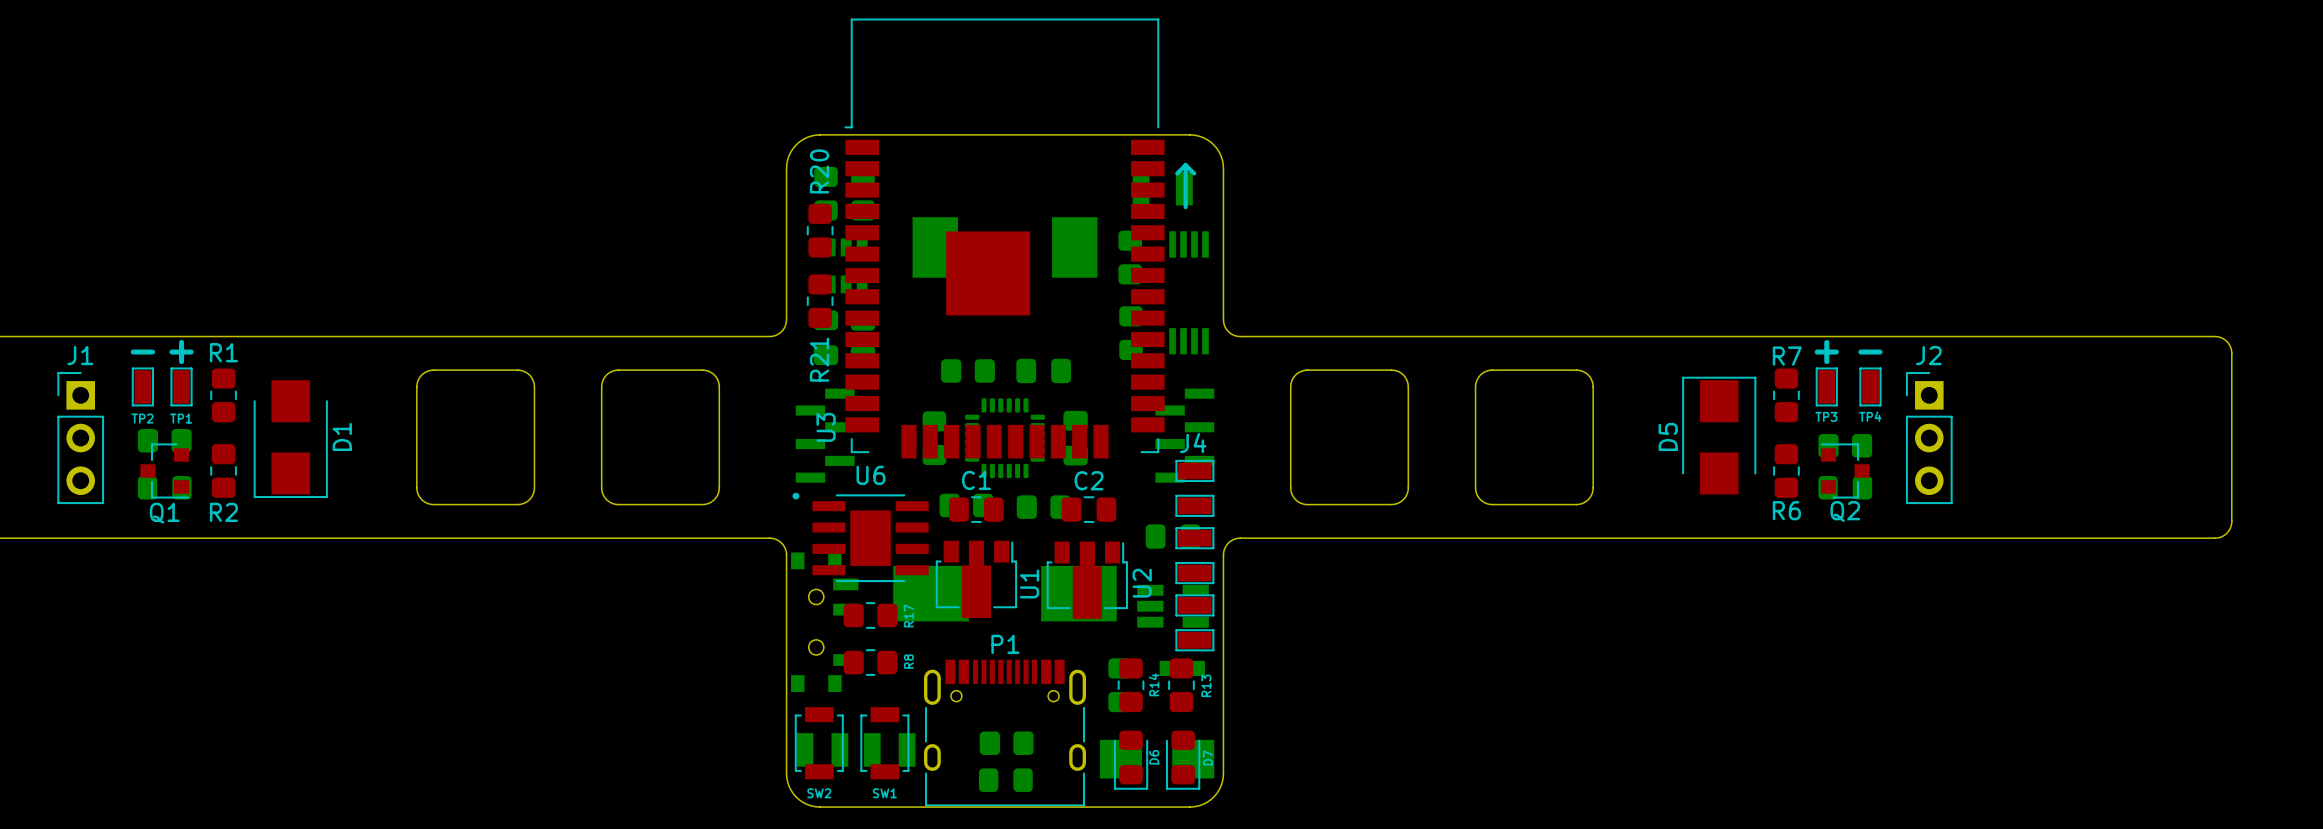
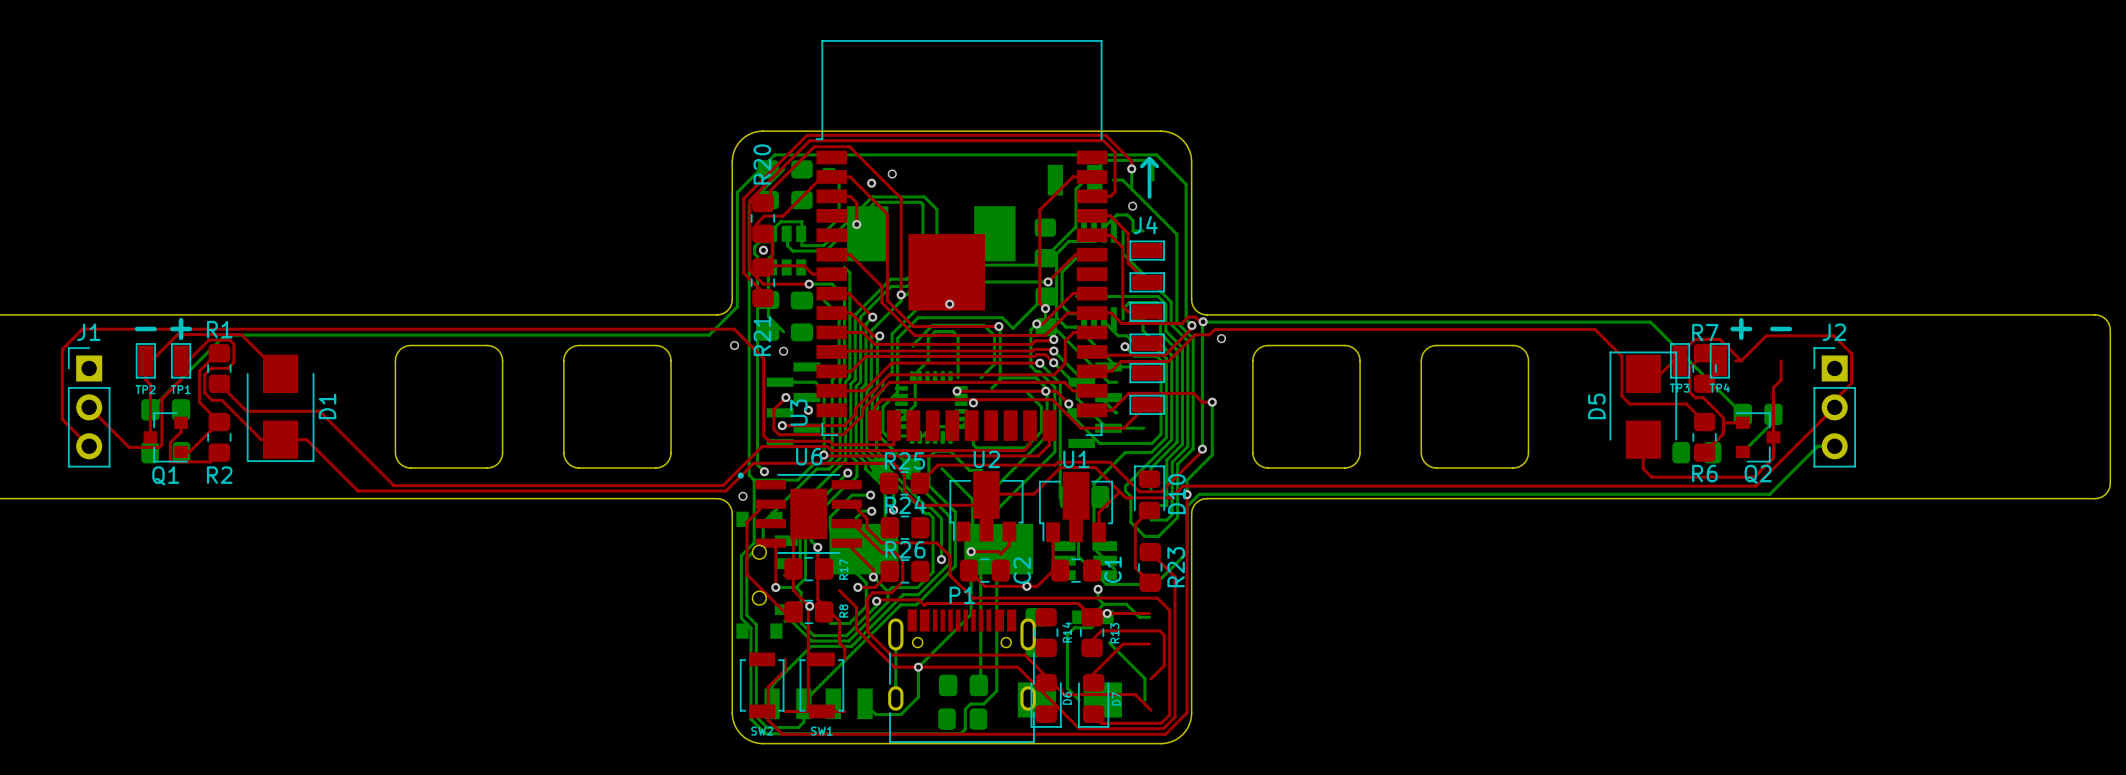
board edge: (1189, 134) (1198, 136) (1210, 141) (1218, 151) (1223, 164) (1223, 319) (1225, 328) (1230, 333) (1238, 336) (1307, 336) -> (1099, 131) (1165, 131) (1179, 137) (1187, 146) (1191, 161) (1191, 301) (1196, 310) (1206, 314)
line: (1185, 165) (1194, 173) -> (1149, 158) (1157, 166)
line: (1185, 165) (1177, 173) -> (1149, 158) (1141, 166)
line: (1185, 165) (1185, 207) -> (1149, 158) (1149, 197)
bottom track: none -> (783, 169) (749, 203) (749, 475) (754, 480)
bottom track: none -> (824, 169) (833, 169) (839, 175) (839, 218) (827, 229) (827, 241) (823, 245) (801, 245) (801, 221) (780, 221) (772, 229) (772, 254) (768, 258) (768, 316) (783, 331)
bottom track: none -> (1131, 168) (1131, 189)
top track: none -> (1131, 168) (1131, 161) (1105, 135) (807, 135) (743, 198) (743, 273) (770, 298)
via: none -> (1131, 168)
via: none -> (892, 174)
top track: none -> (1092, 176) (1072, 176) (1039, 210) (1039, 302) (1045, 308)
bottom track: none -> (1113, 180) (1122, 180) (1176, 234) (1176, 322) (1193, 338) (1193, 448) (1177, 464) (1177, 517) (1158, 536) (1144, 536) (1130, 522) (1130, 496) (1125, 490) (1125, 486) (1171, 439) (1171, 355) (1154, 337) (1149, 337) (1143, 330) (1143, 319) (1133, 319)
bottom track: none -> (1152, 180) (1152, 160) (1104, 160) (1076, 189) (1076, 227) (1050, 252) (1050, 263) (1047, 265) (936, 265) (906, 294) (901, 294) (901, 300) (871, 330) (871, 386) (866, 390) (866, 448) (876, 458) (876, 464) (925, 513) (929, 513) (933, 517) (933, 572) (917, 587) (892, 587) (887, 591)
via: none -> (871, 183)
top track: none -> (831, 196) (850, 196) (856, 202) (856, 224)
top track: none -> (1092, 196) (1110, 196) (1115, 191) (1115, 152) (1103, 140) (809, 140) (749, 200) (749, 270) (763, 284) (809, 284)
top track: none -> (770, 203) (770, 190) (814, 146) (849, 146) (901, 198) (901, 294)
via: none -> (1132, 206)
top track: none -> (1092, 215) (1110, 215) (1128, 233) (1128, 263) (1147, 282)
top track: none -> (756, 224) (764, 216) (782, 216) (822, 176) (850, 176) (887, 214) (887, 300) (913, 326) (998, 326)
bottom track: none -> (856, 224) (856, 220) (875, 202) (920, 202) (922, 204) (922, 263) (906, 279) (890, 279) (855, 314) (855, 379) (850, 384) (850, 455) (856, 461) (856, 476) (811, 520) (811, 540) (817, 547)
via: none -> (856, 224)
U3 position: (1004, 238) -> (961, 240)
bottom track: none -> (1123, 230) (1123, 253) (1171, 301) (1171, 324) (1187, 340) (1187, 446) (1172, 462) (1172, 514) (1166, 520) (1151, 520)
bottom track: none -> (1143, 230) (1133, 230) (1133, 220) (1127, 214) (1116, 214) (1090, 241) (1068, 241) (1056, 253) (1056, 317) (1066, 327) (1076, 327) (1116, 366) (1143, 366)
top track: none -> (770, 233) (772, 235) (772, 265)
bottom track: none -> (787, 233) (787, 245) (792, 251) (825, 251) (834, 242) (834, 234) (872, 196) (924, 196) (936, 209) (936, 256) (907, 286) (891, 286) (860, 317) (860, 381) (856, 386) (856, 453) (865, 463) (865, 469) (885, 488) (885, 535) (894, 544)
top track: none -> (1092, 235) (1110, 235) (1122, 247) (1122, 306) (1128, 311) (1147, 311)
bottom track: none -> (772, 241) (759, 241) (754, 246) (754, 253) (757, 256) (757, 464) (764, 471) (762, 471)
via: none -> (763, 250)
top track: none -> (831, 254) (850, 254) (882, 286) (882, 302) (914, 335) (1045, 335) (1067, 313) (1111, 313) (1121, 323) (1182, 323) (1188, 317) (1195, 317) (1200, 322)
top track: none -> (1092, 254) (1075, 254) (1048, 281)
bottom track: none -> (1076, 258) (1062, 272) (1062, 305) (1070, 313) (1096, 313) (1118, 335) (1126, 335) (1135, 344) (1152, 344) (1166, 358) (1166, 437) (1151, 452) (1125, 452) (1093, 483) (1093, 548) (1114, 569)
top track: none -> (772, 265) (804, 265) (812, 274) (831, 274)
bottom track: none -> (844, 267) (849, 272) (849, 377) (845, 381) (845, 460) (800, 505) (800, 575) (784, 575)
bottom track: none -> (1048, 281) (944, 281) (892, 333) (892, 372) (882, 381) (882, 389) (877, 395) (877, 434) (905, 462) (911, 462) (911, 478) (949, 516) (949, 563) (918, 594) (903, 594) (851, 646) (811, 646) (772, 685) (772, 703)
via: none -> (1048, 281)
bottom track: none -> (809, 284) (831, 284) (844, 296) (844, 375) (840, 379) (840, 458) (829, 469) (816, 469) (763, 522) (763, 541) (746, 558) (746, 615) (756, 624) (756, 716) (767, 727) (798, 727) (803, 722) (803, 701) (900, 604) (916, 604) (955, 566) (955, 511) (928, 485) (928, 457) (935, 451) (950, 451) (969, 470) (981, 470)
via: none -> (809, 284)
top track: none -> (831, 293) (849, 293) (872, 317)
top track: none -> (1092, 293) (1072, 293) (1042, 323) (1036, 323)
via: none -> (901, 294)
bottom track: none -> (1056, 295) (1053, 298) (1042, 298) (1013, 328) (1002, 317) (918, 317) (897, 338) (897, 392) (882, 406) (882, 432) (886, 435) (922, 435) (932, 426) (961, 426) (973, 415)
bottom track: none -> (1076, 296) (1158, 296) (1165, 304) (1165, 331) (1182, 347) (1182, 444) (1166, 459) (1166, 505) (1151, 505)
bottom track: none -> (824, 300) (839, 315) (839, 373) (832, 379) (832, 458) (827, 463) (814, 463) (797, 480) (754, 480)
via: none -> (949, 304)
bottom track: none -> (1045, 308) (1045, 319) (1108, 382) (1116, 382)
via: none -> (1045, 308)
top track: none -> (831, 313) (850, 313) (873, 335) (879, 335)
board edge: (2214, 336) (2226, 341) (2231, 353) (2231, 523) (2226, 533) (2214, 538) -> (2033, 314) (2098, 315) (2107, 320) (2110, 330) (2109, 489) (2104, 495) (2097, 498) (2033, 498)
bottom track: none -> (872, 317) (865, 323) (865, 384) (861, 388) (861, 451) (871, 460) (871, 466) (893, 489) (893, 510)
via: none -> (872, 317)
bottom track: none -> (1123, 319) (1123, 308) (1129, 302) (1156, 302) (1160, 306) (1160, 333) (1177, 349) (1177, 442) (1151, 468) (1151, 490)
via: none -> (1203, 321)
bottom track: none -> (1036, 323) (1030, 329) (1030, 366) (1054, 387) (1054, 451) (980, 526) (980, 683) (978, 685)
via: none -> (1036, 323)
bottom track: none -> (1191, 325) (1186, 319) (1186, 184) (1156, 154) (774, 154) (737, 192) (737, 306) (709, 335) (225, 335) (150, 409)
top track: none -> (1191, 325) (1191, 328) (1164, 355) (1095, 355) (1092, 351)
via: none -> (1191, 325)
bottom track: none -> (998, 326) (1000, 379) (991, 388)
via: none -> (998, 326)
text position: + (1826, 352) -> + (1741, 329)
text position: - (1870, 352) -> - (1781, 329)
top track: none -> (831, 332) (862, 332) (874, 344) (1031, 344) (1035, 340) (1052, 339)
top track: none -> (1092, 332) (1073, 332) (1065, 340) (1065, 363) (1054, 374) (889, 374) (855, 408) (855, 414) (844, 425) (782, 425)
bottom track: none -> (879, 335) (877, 338) (877, 387) (872, 393) (872, 436) (876, 440) (876, 450) (881, 456) (881, 462) (926, 506) (929, 506) (941, 518) (941, 559)
via: none -> (879, 335)
via: none -> (1221, 338)
via: none -> (1053, 339)
via: none -> (734, 345)
part: (968, 370) -> none
bottom track: none -> (912, 346) (932, 325) (983, 325) (994, 335) (994, 364) (981, 377)
part: (1043, 370) -> none
board edge: (1374, 370) (1303, 370) (1294, 376) (1290, 386) (1290, 487) (1294, 498) (1305, 504) (1374, 504) -> (1268, 345) (1257, 350) (1252, 360) (1253, 454) (1257, 463) (1268, 468)
board edge: (1391, 370) (1403, 375) (1408, 386) (1408, 489) (1403, 499) (1391, 504) -> (1283, 345) (1348, 346) (1356, 351) (1360, 360)
board edge: (1559, 370) (1488, 370) (1479, 376) (1475, 386) -> (1436, 345) (1425, 350) (1421, 360) (1421, 454) (1425, 463) (1436, 468)
board edge: (1576, 370) (1588, 375) (1593, 386) (1593, 489) (1588, 499) (1576, 504) -> (1451, 345) (1517, 346) (1525, 351) (1528, 360) (1528, 452) (1525, 462) (1515, 467) (1451, 468)
bottom track: none -> (1125, 346) (1134, 356) (1156, 356) (1161, 360) (1161, 434) (1151, 443) (1099, 443) (1068, 412) (1068, 403)
via: none -> (1125, 346)
via: none -> (783, 351)
bottom track: none -> (1053, 351) (1116, 412)
top track: none -> (1053, 351) (1034, 349) (1032, 351) (831, 351)
via: none -> (1053, 351)
top track: none -> (219, 353) (199, 371) (199, 402) (219, 422) (189, 451) (181, 451)
top track: none -> (1704, 353) (1689, 367) (1689, 392) (1695, 397) (1703, 397) (1723, 417) (1723, 433) (1704, 452)
top track: none -> (1735, 360) (1741, 360)
top track: none -> (1741, 360) (1766, 335) (1833, 335) (1851, 353) (1851, 383) (1827, 407) (1834, 407) (1755, 486) (1183, 486) (1171, 497) (1125, 497) (1095, 467) (1060, 467) (1033, 494) (991, 494) (986, 499) (986, 530)
top track: none -> (1741, 360) (1719, 339) (1695, 339) (1660, 373) (1643, 373)
top track: none -> (1781, 360) (1781, 379) (1773, 387) (1773, 458) (1754, 477) (1651, 477) (1643, 468) (1643, 439)
bottom track: none -> (1039, 363) (1060, 383) (1060, 497) (1078, 516) (1078, 556) (1106, 584) (1155, 584) (1187, 552) (1187, 506) (1199, 494) (1769, 494) (1817, 446) (1834, 446)
top track: none -> (1039, 363) (891, 363) (863, 390) (831, 390)
via: none -> (1039, 363)
bottom track: none -> (1053, 362) (1077, 386) (1077, 398) (1106, 428) (1143, 428)
top track: none -> (1053, 362) (1045, 354) (1034, 356) (865, 356) (850, 371) (831, 371)
via: none -> (1053, 362)
R7 position: (1786, 395) -> (1704, 368)
top track: none -> (1092, 371) (1111, 371) (1121, 361) (1168, 361) (1195, 334) (1209, 334) (1215, 329) (1595, 329) (1621, 356) (1621, 396) (1629, 404) (1686, 404) (1704, 422)
top track: none -> (280, 373) (241, 334) (177, 334) (151, 360) (145, 360) (145, 379) (150, 384) (150, 437)
bottom track: none -> (958, 377) (958, 336) (953, 331) (935, 331) (928, 338) (928, 360) (915, 373) (915, 405) (897, 422)
bottom track: none -> (1000, 377) (1036, 377) (1045, 387) (1047, 435) (983, 499) (972, 499)
bottom track: none -> (780, 382) (815, 382) (824, 391) (823, 455)
top track: none -> (219, 383) (246, 411) (319, 411) (393, 485) (723, 485) (762, 446) (827, 446) (831, 450) (1024, 450) (1030, 444) (1030, 425)
top track: none -> (1092, 390) (1072, 390) (1064, 382) (889, 382) (862, 409) (862, 415) (843, 434) (779, 434) (773, 429) (773, 409) (785, 397)
top track: none -> (957, 391) (1056, 391) (1068, 403)
via: none -> (957, 391)
bottom track: none -> (1026, 391) (1041, 406) (1041, 431) (1025, 447) (976, 447) (973, 444) (973, 437)
via: none -> (1045, 391)
via: none -> (785, 397)
bottom track: none -> (1212, 402) (1212, 455) (1187, 480) (1187, 494)
top track: none -> (1212, 402) (1202, 402) (1193, 393) (1128, 393) (1111, 410) (1092, 410)
via: none -> (1212, 402)
via: none -> (973, 402)
via: none -> (1068, 403)
part position: (825, 435) -> (793, 405)
top track: none -> (1156, 404) (1147, 404) (1123, 428) (1080, 428) (1052, 399) (882, 399) (874, 407) (874, 425)
D5 position: (1719, 435) -> (1643, 405)
top track: none -> (89, 407) (129, 447) (159, 447) (161, 444) (161, 399) (181, 379) (181, 360) (188, 360) (208, 340) (229, 340) (233, 344) (233, 362) (228, 368) (211, 368) (204, 374) (204, 392) (212, 400) (221, 400) (261, 439) (306, 439) (357, 490) (725, 490) (753, 463) (817, 463)
part: (934, 438) -> none
part: (1075, 438) -> none
J2 position: (1929, 438) -> (1834, 407)
via: none -> (808, 410)
part position: (1845, 445) -> (1758, 414)
bottom track: none -> (1742, 414) (1650, 322) (1203, 321) (1202, 449)
bottom track: none -> (1773, 414) (1773, 421) (1742, 452)
top track: none -> (181, 422) (181, 432) (170, 442) (171, 461) (210, 461) (219, 452)
top track: none -> (1723, 422) (1742, 422)
via: none -> (782, 425)
top track: none -> (893, 425) (893, 444) (833, 444) (829, 441) (769, 441) (763, 435) (763, 358) (734, 329) (82, 329) (62, 349) (62, 419) (89, 446)
top track: none -> (1049, 425) (1049, 444) (1038, 455) (823, 455)
R6 position: (1786, 470) -> (1704, 437)
Q2 position: (1845, 470) -> (1758, 437)
C1 name rotation: 0° (976, 480) -> 90° counterclockwise (1112, 569)
C1 name position: C1 (976, 480) -> C1 (1112, 569)
C2 name rotation: 0° (1089, 480) -> 90° counterclockwise (1022, 570)
C2 name position: C2 (1089, 480) -> C2 (1022, 570)
top track: none -> (1202, 449) (1161, 491) (1139, 491) (1109, 462) (1058, 462) (1055, 465) (938, 465) (919, 483)
via: none -> (1202, 449)
board edge: (1475, 487) (1479, 498) (1488, 504) (1559, 504) -> (1360, 452) (1356, 462) (1348, 467) (1283, 468)
via: none -> (823, 455)
top track: none -> (817, 463) (893, 463) (904, 474) (904, 491) (918, 505) (982, 505) (986, 509)
bottom track: none -> (942, 468) (972, 499)
part: (1043, 507) -> none
via: none -> (764, 471)
C1 position: (976, 509) -> (1076, 570)
C2 position: (1089, 509) -> (984, 570)
bottom track: none -> (847, 473) (805, 515) (805, 578) (796, 587)
via: none -> (847, 473)
bottom track: none -> (754, 480) (754, 542) (741, 555) (741, 618) (750, 627) (750, 718) (765, 733) (960, 733) (965, 729) (965, 709) (970, 704) (983, 704) (996, 691) (996, 577) (1029, 544)
R25: none -> (904, 483)
top track: none -> (1119, 491) (1098, 512) (1098, 532)
D10: none -> (1149, 492)
top track: none -> (1187, 494) (1187, 712) (1165, 734) (782, 734) (768, 720) (768, 686) (785, 670) (785, 659)
via: none -> (1187, 494)
bottom track: none -> (870, 495) (852, 495) (830, 517) (830, 530)
via: none -> (870, 495)
via: none -> (742, 496)
U6 position: (860, 537) -> (799, 513)
board edge: (1307, 538) (1238, 538) (1230, 541) (1224, 548) (1223, 777) (1220, 786) (1213, 797) (1202, 804) (1189, 807) -> (1206, 498) (1196, 503) (1191, 511) (1191, 713) (1189, 724) (1182, 734) (1168, 742) (1099, 743)
bottom track: none -> (972, 499) (971, 614) (918, 667) (918, 697) (901, 714) (875, 714) (865, 703)
top track: none -> (770, 504) (765, 504) (747, 522) (747, 574) (793, 621)
top track: none -> (846, 504) (852, 504) (867, 518) (867, 528) (881, 542) (936, 542) (949, 556) (949, 575) (972, 598) (1157, 598) (1169, 610) (1169, 714) (1161, 723) (1101, 723) (1088, 710)
via: none -> (893, 510)
top track: none -> (1149, 510) (1135, 524) (1135, 567) (1150, 582)
bottom track: none -> (871, 511) (862, 511) (856, 517) (856, 573) (866, 583) (866, 606) (849, 623) (830, 623)
via: none -> (871, 511)
top track: none -> (799, 513) (793, 519) (793, 590) (808, 605) (808, 711)
J4 position: (1194, 555) -> (1147, 327)
top track: none -> (846, 523) (852, 523) (882, 552) (895, 552) (902, 560) (902, 581) (891, 592) (873, 592) (867, 598) (867, 631) (890, 655) (1024, 655) (1064, 694) (1135, 694) (1151, 710)
R24: none -> (905, 527)
top track: none -> (1009, 531) (1009, 545) (1000, 553) (998, 551) (971, 551)
top track: none -> (1053, 532) (1053, 570)
U1 rotation: 0° (976, 579) -> 180° (1076, 507)
U1 position: (976, 579) -> (1076, 507)
U2 rotation: 0° (1087, 580) -> 180° (986, 506)
U2 name position: U2 (1142, 583) -> U2 (986, 459)
U1 name position: U1 (1029, 584) -> U1 (1076, 459)
top track: none -> (770, 543) (775, 547) (775, 587)
top track: none -> (846, 543) (873, 569) (873, 577)
top track: none -> (817, 547) (817, 599) (839, 621) (839, 643) (844, 648) (844, 659)
via: none -> (817, 547)
via: none -> (971, 551)
top track: none -> (1150, 552) (1175, 576) (1175, 717) (1163, 728) (1079, 728) (1017, 667) (894, 667) (856, 629) (856, 607) (839, 590)
via: none -> (941, 559)
top track: none -> (962, 564) (984, 586) (1037, 586) (1053, 570)
R23: none -> (1150, 567)
top track: none -> (889, 571) (875, 587) (857, 587)
R26: none -> (905, 571)
bottom track: none -> (873, 577) (887, 591)
via: none -> (873, 577)
via: none -> (1026, 586)
bottom track: none -> (775, 587) (796, 587)
via: none -> (775, 587)
bottom track: none -> (796, 587) (801, 592) (801, 622) (813, 635) (846, 635) (876, 605) (876, 601)
via: none -> (857, 587)
bottom track: none -> (1098, 589) (1098, 598) (1103, 604)
via: none -> (1098, 589)
bottom track: none -> (887, 591) (887, 601) (848, 641) (811, 641) (792, 621) (784, 621)
top track: none -> (876, 601) (918, 599) (924, 605) (926, 603) (1078, 603) (1088, 613) (1149, 613)
via: none -> (876, 601)
bottom track: none -> (1103, 604) (1126, 604) (1139, 617) (1149, 617)
bottom track: none -> (1103, 604) (1096, 611) (1096, 622) (1091, 627) (1074, 627) (1067, 634) (1067, 688) (1079, 699)
via: none -> (809, 606)
via: none -> (1107, 613)
bottom track: none -> (895, 634) (895, 698)
bottom track: none -> (1109, 642) (1144, 678) (1144, 699)
top track: none -> (1088, 644) (1101, 630) (1159, 630) (1164, 635) (1164, 665) (1151, 678)
top track: none -> (1149, 644) (1123, 644) (1088, 678)
via: none -> (918, 667)
P1 position: (1005, 733) -> (961, 676)
part position: (1006, 743) -> (963, 685)
part position: (856, 749) -> (818, 703)
top track: none -> (785, 711) (844, 711)
part position: (1005, 780) -> (962, 719)

